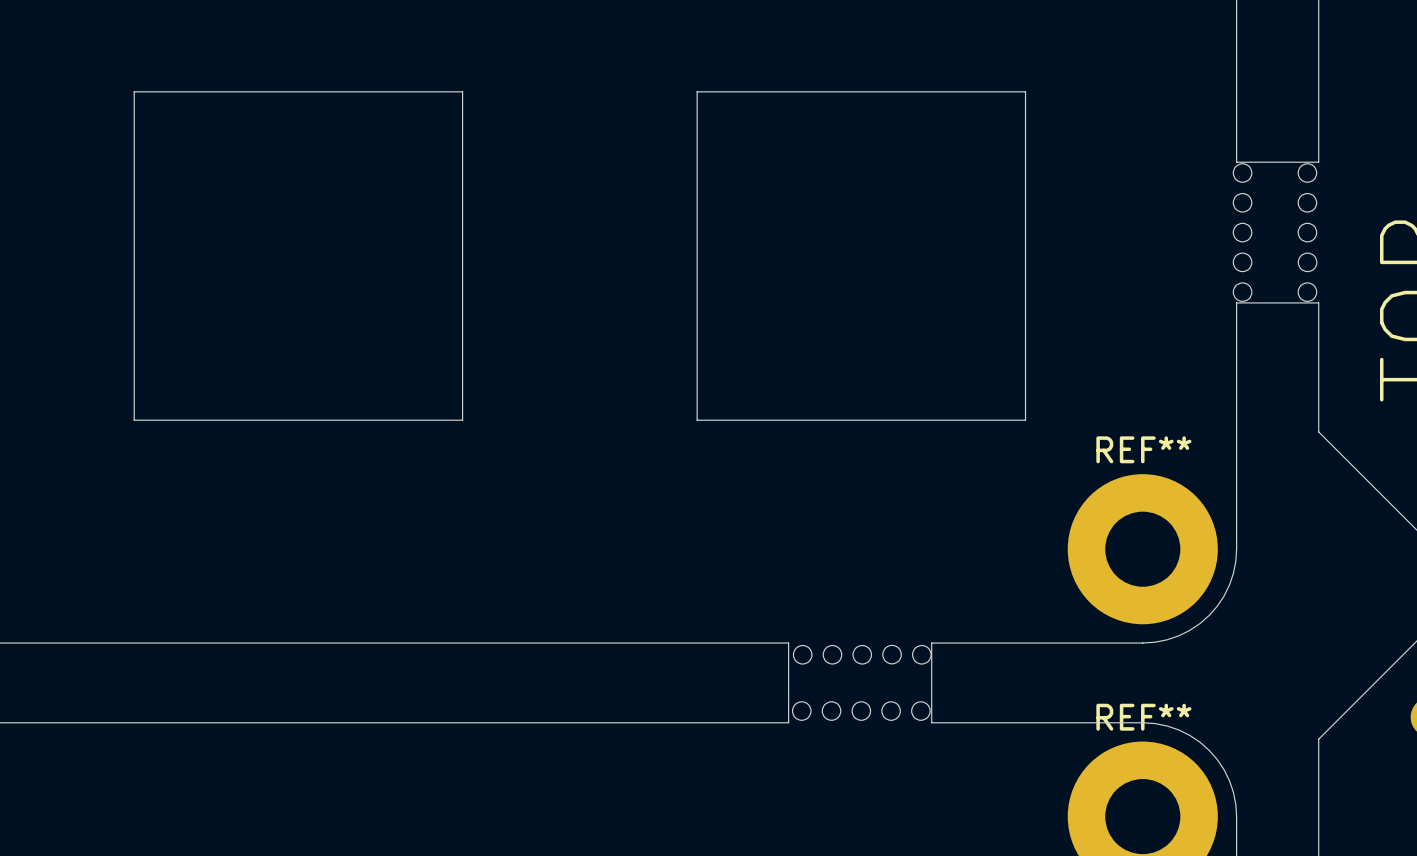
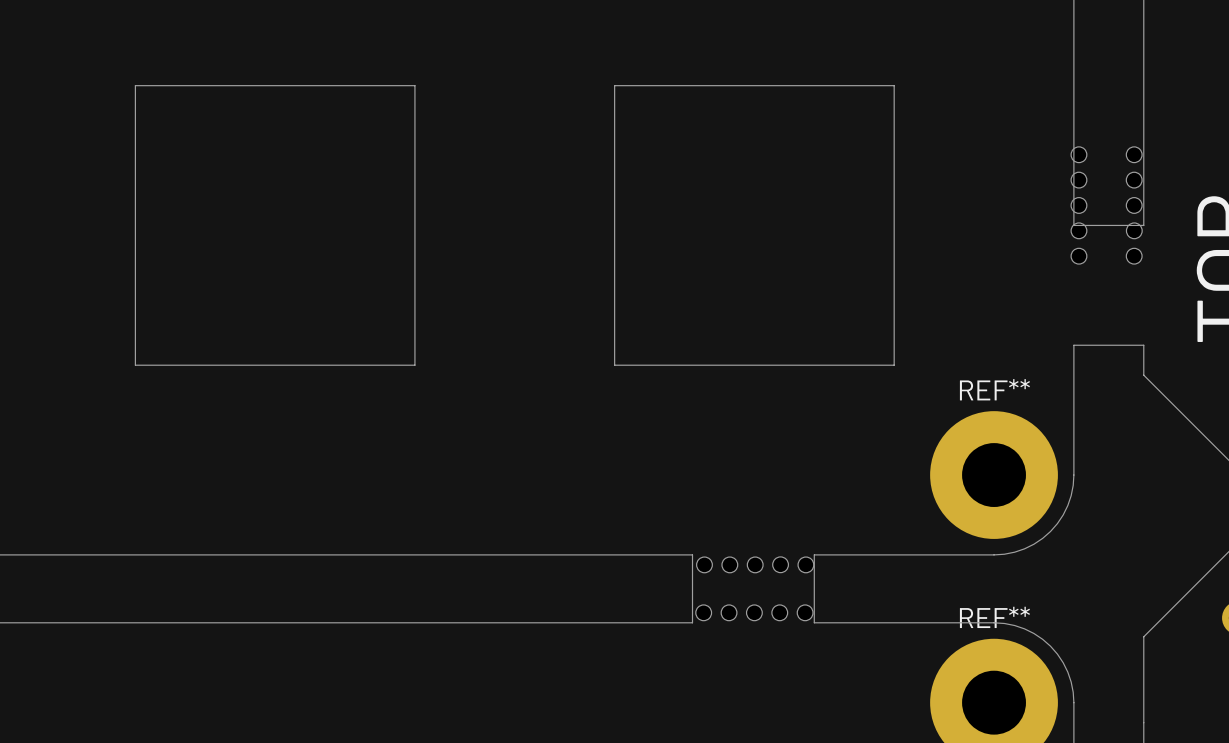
board edge: (1236, 162) (1318, 162) -> (1073, 145) (1073, 225) (1143, 225) (1143, 145)
board edge: (1236, 396) (1236, 302) (1318, 302) (1318, 396) -> (1073, 345) (1143, 345)

